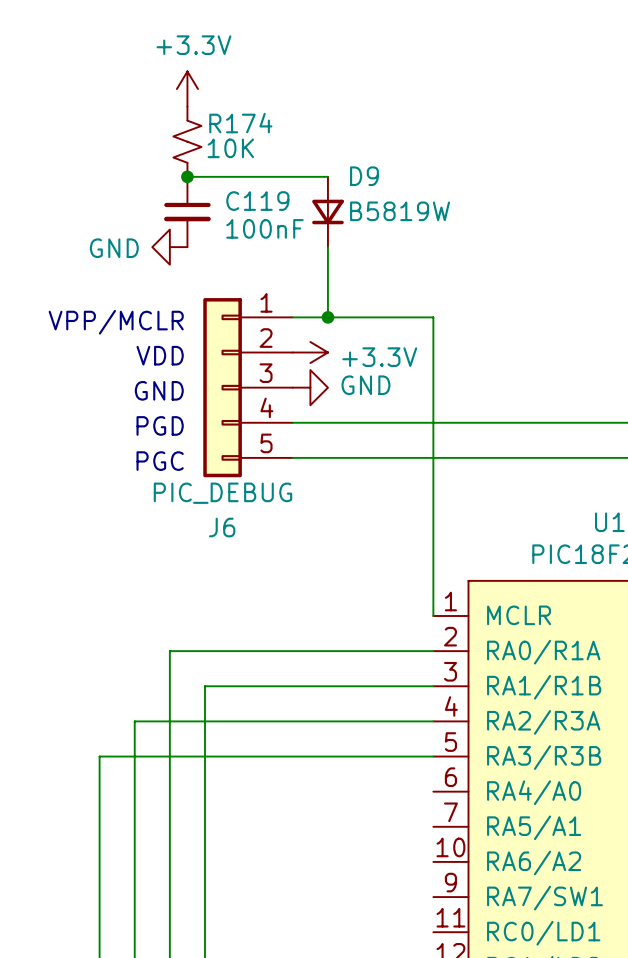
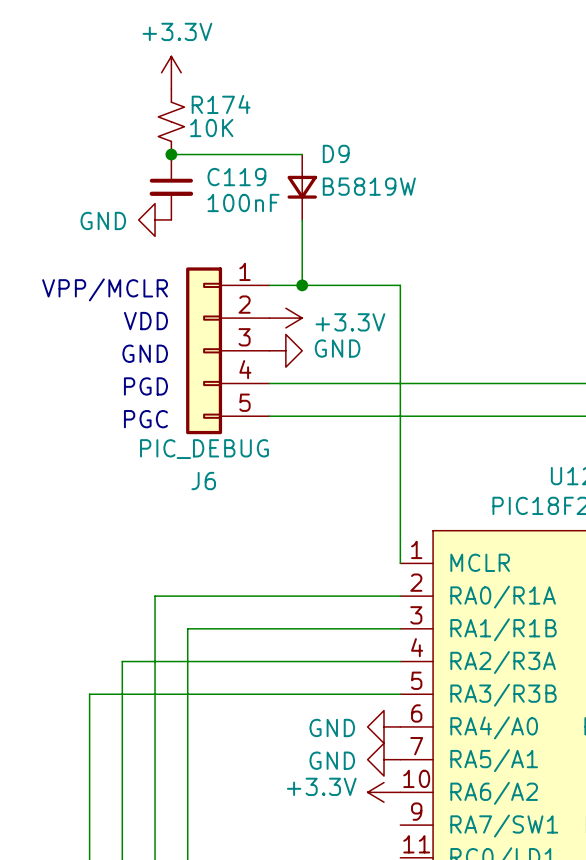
power symbol: none -> GND (383, 726)
power symbol: none -> GND (383, 759)
power symbol: none -> +3.3V (383, 792)

